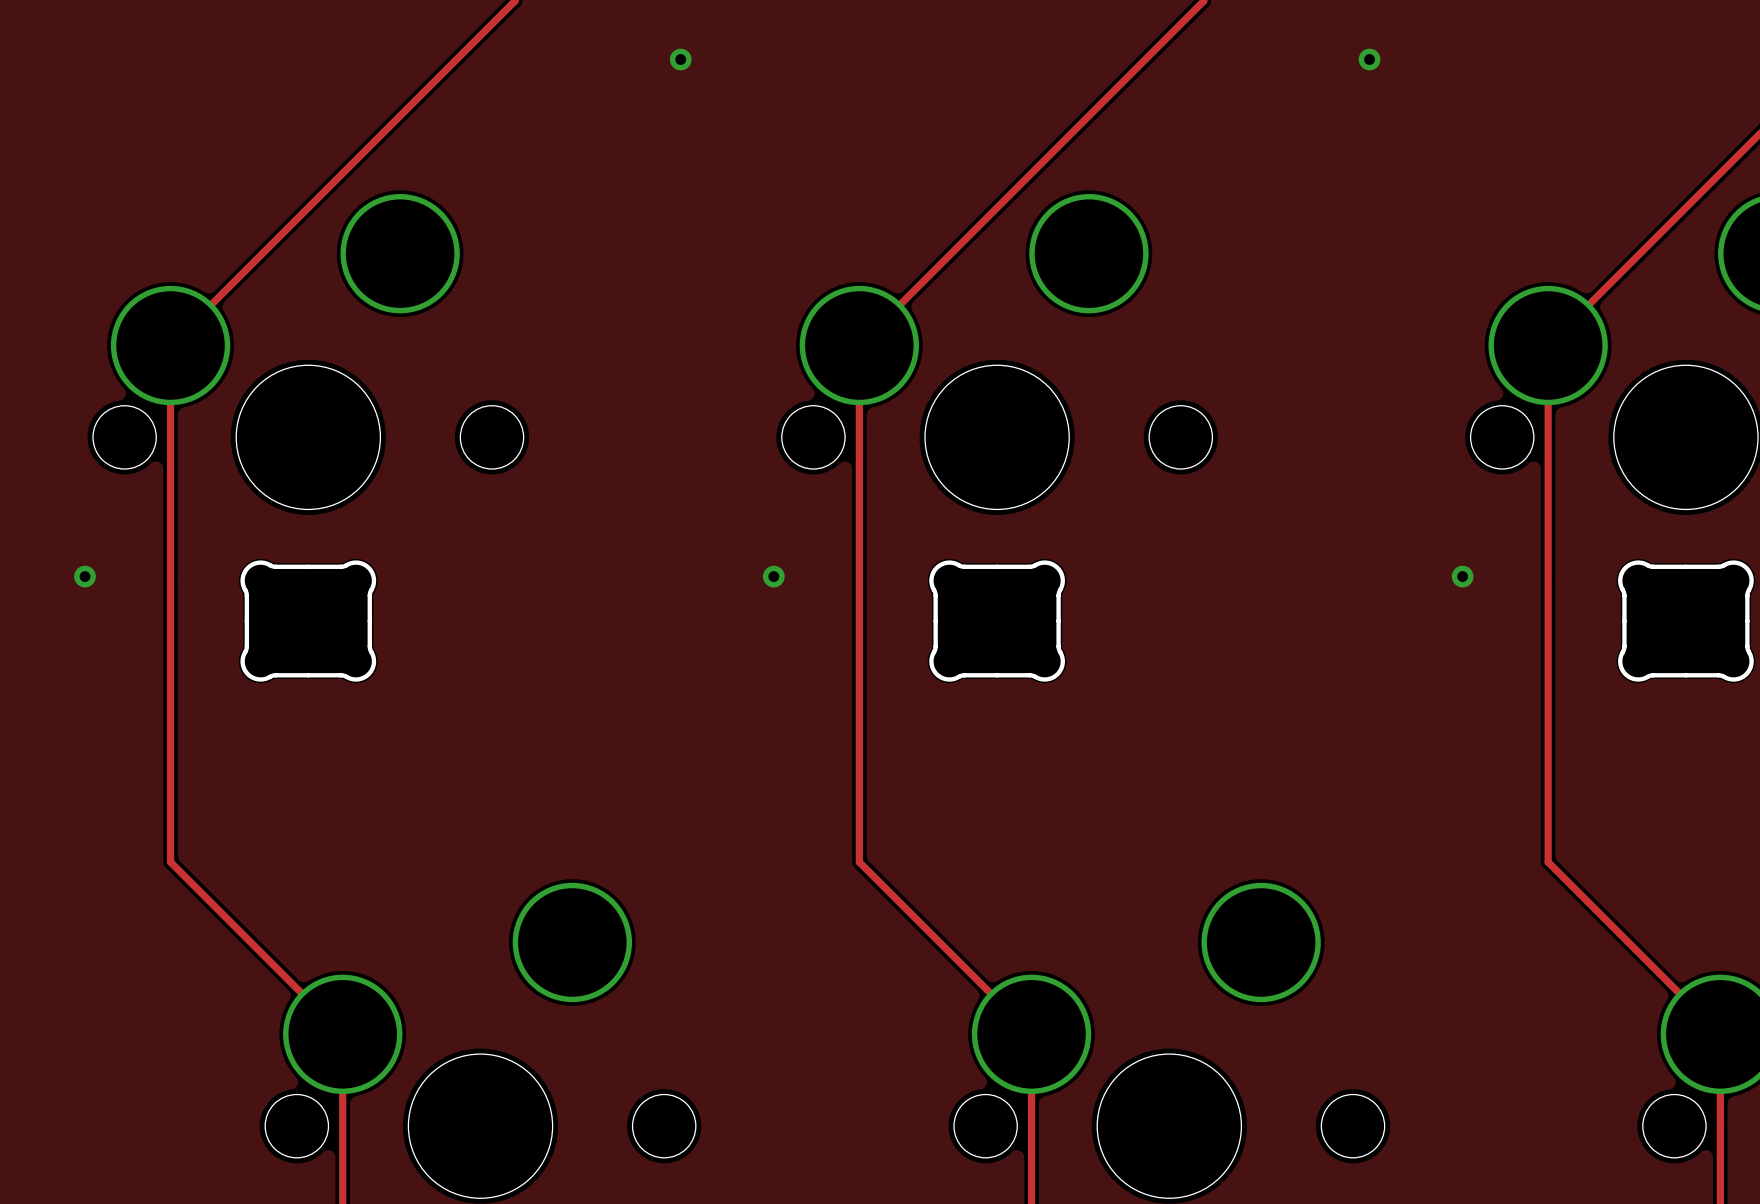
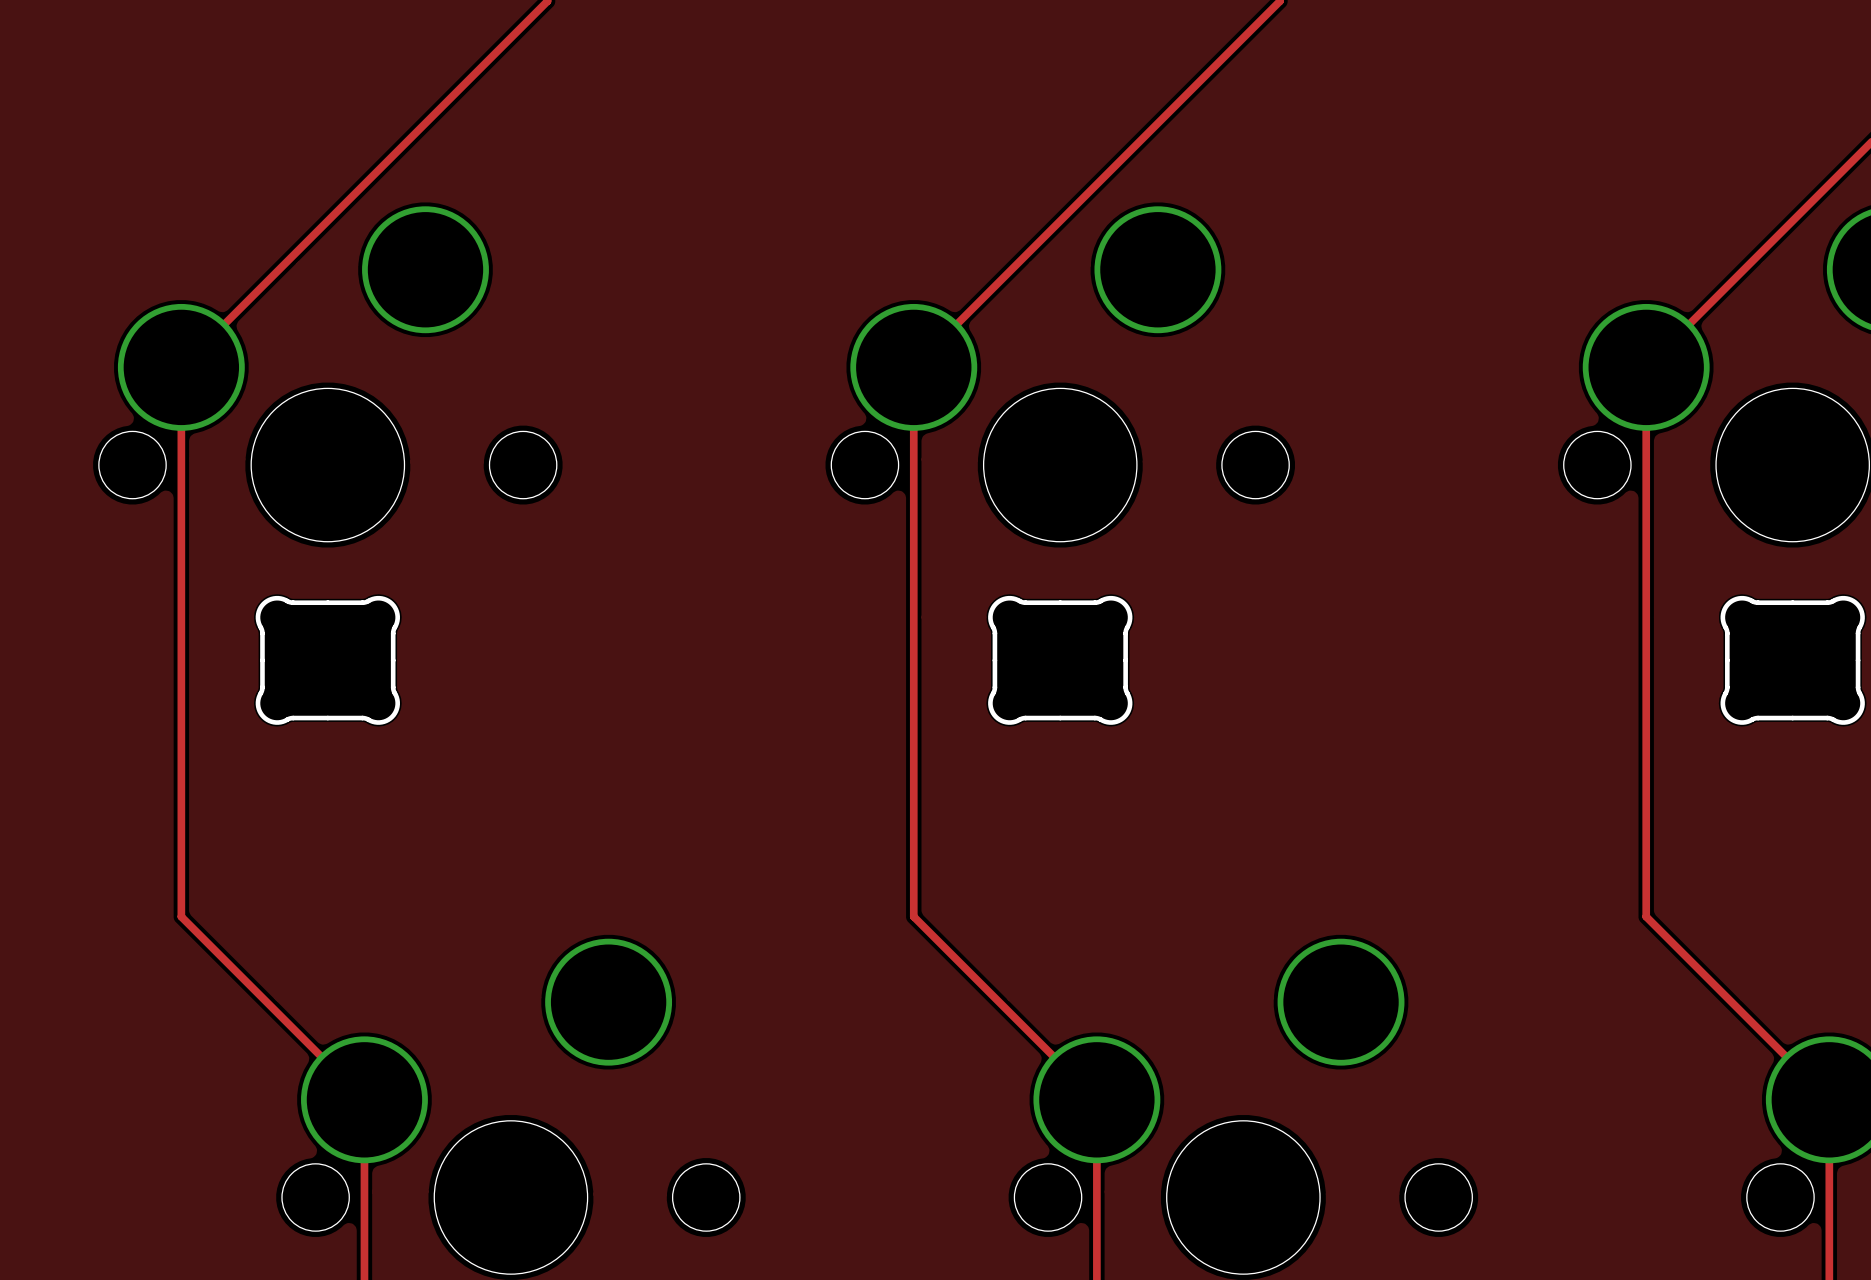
via: (680, 59) -> none
via: (1369, 59) -> none
via: (85, 576) -> none
via: (773, 576) -> none
via: (1462, 576) -> none

